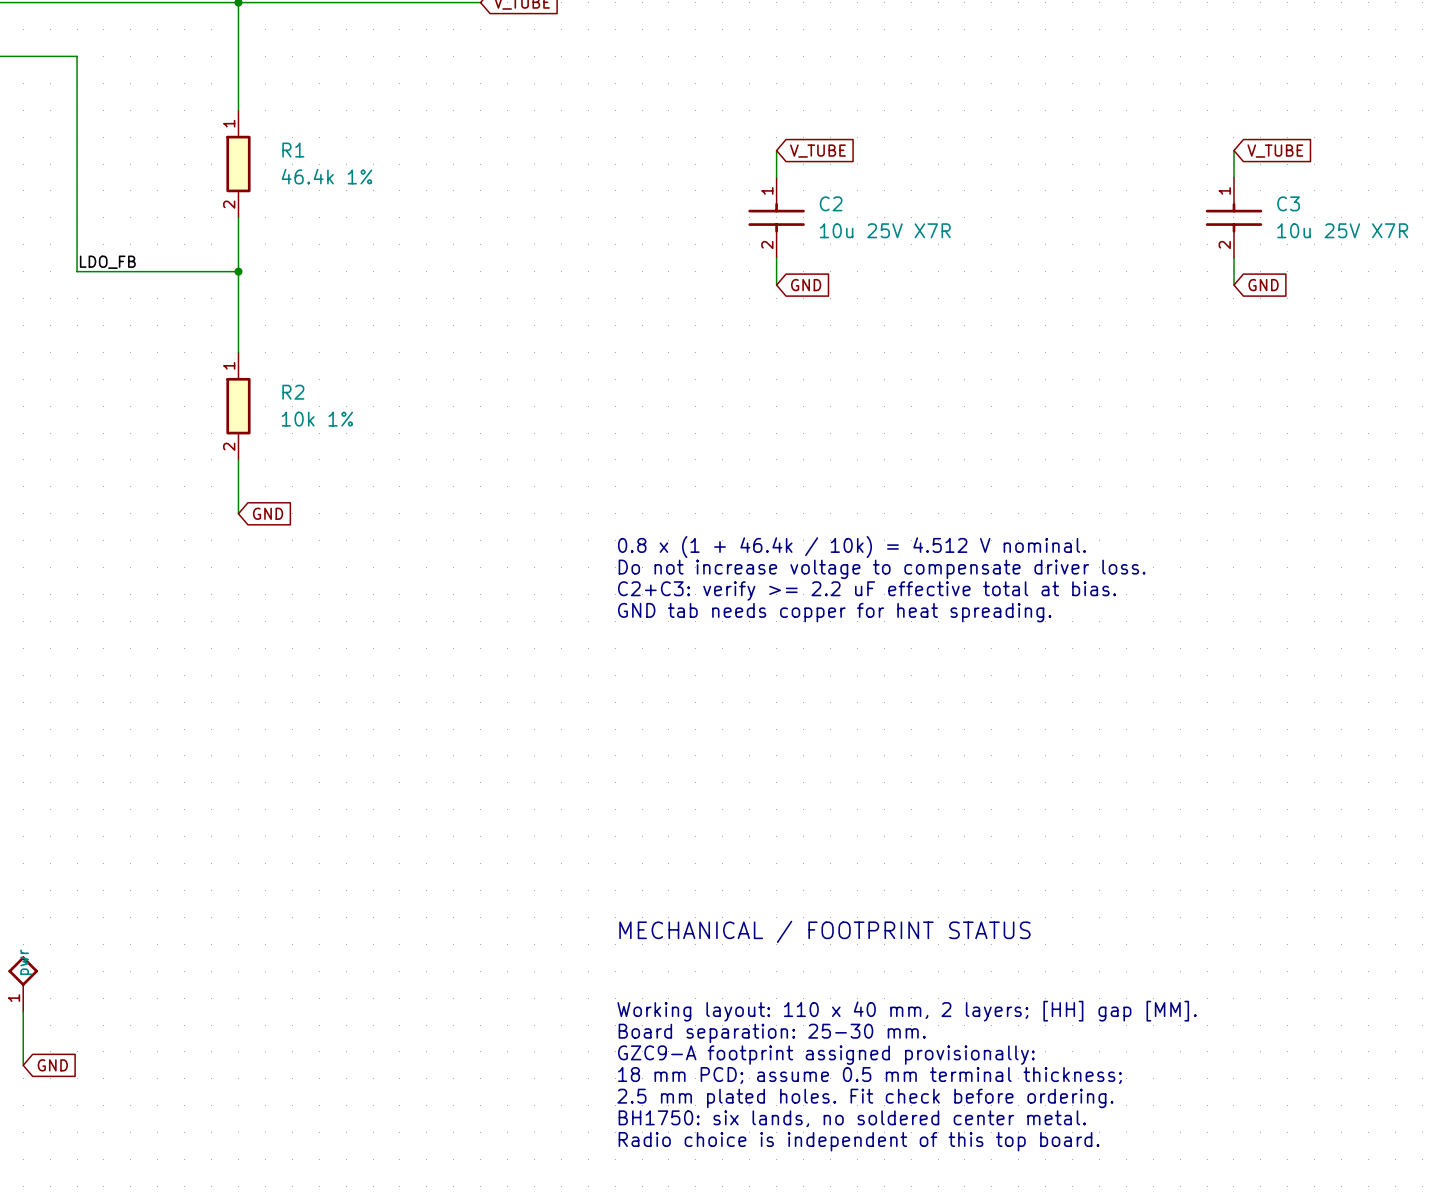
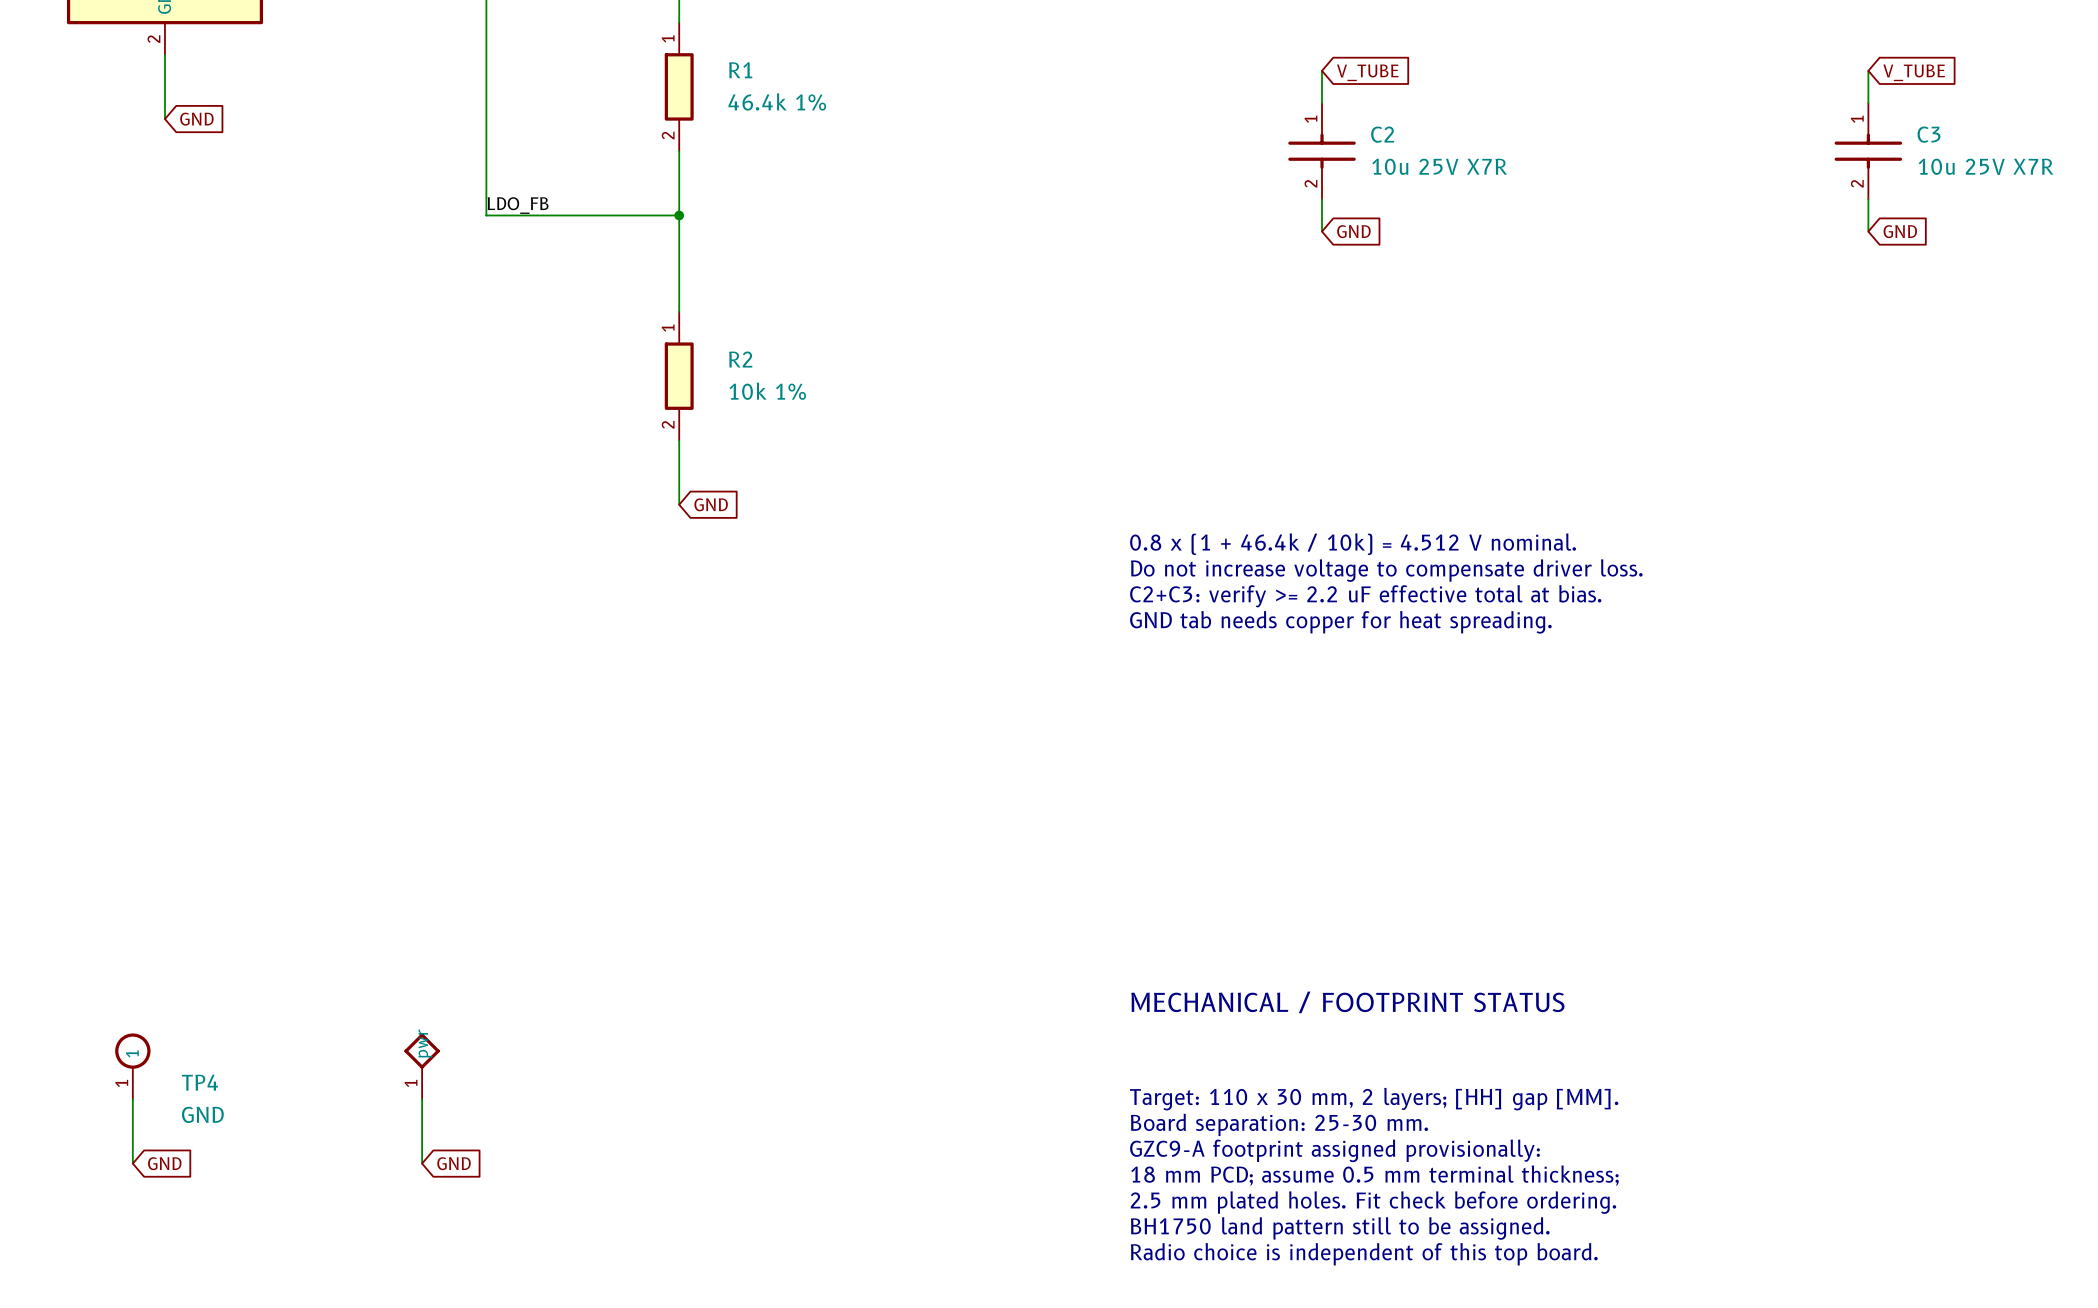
text: Working layout: 110 x 40 mm, 2 layers; [HH] gap [MM]. (907, 1011) -> Target: 110 x 30 mm, 2 layers; [HH] gap [MM]. (1374, 1099)
text: BH1750: six lands, no soldered center metal. (852, 1118) -> BH1750 land pattern still to be assigned. (1340, 1228)

